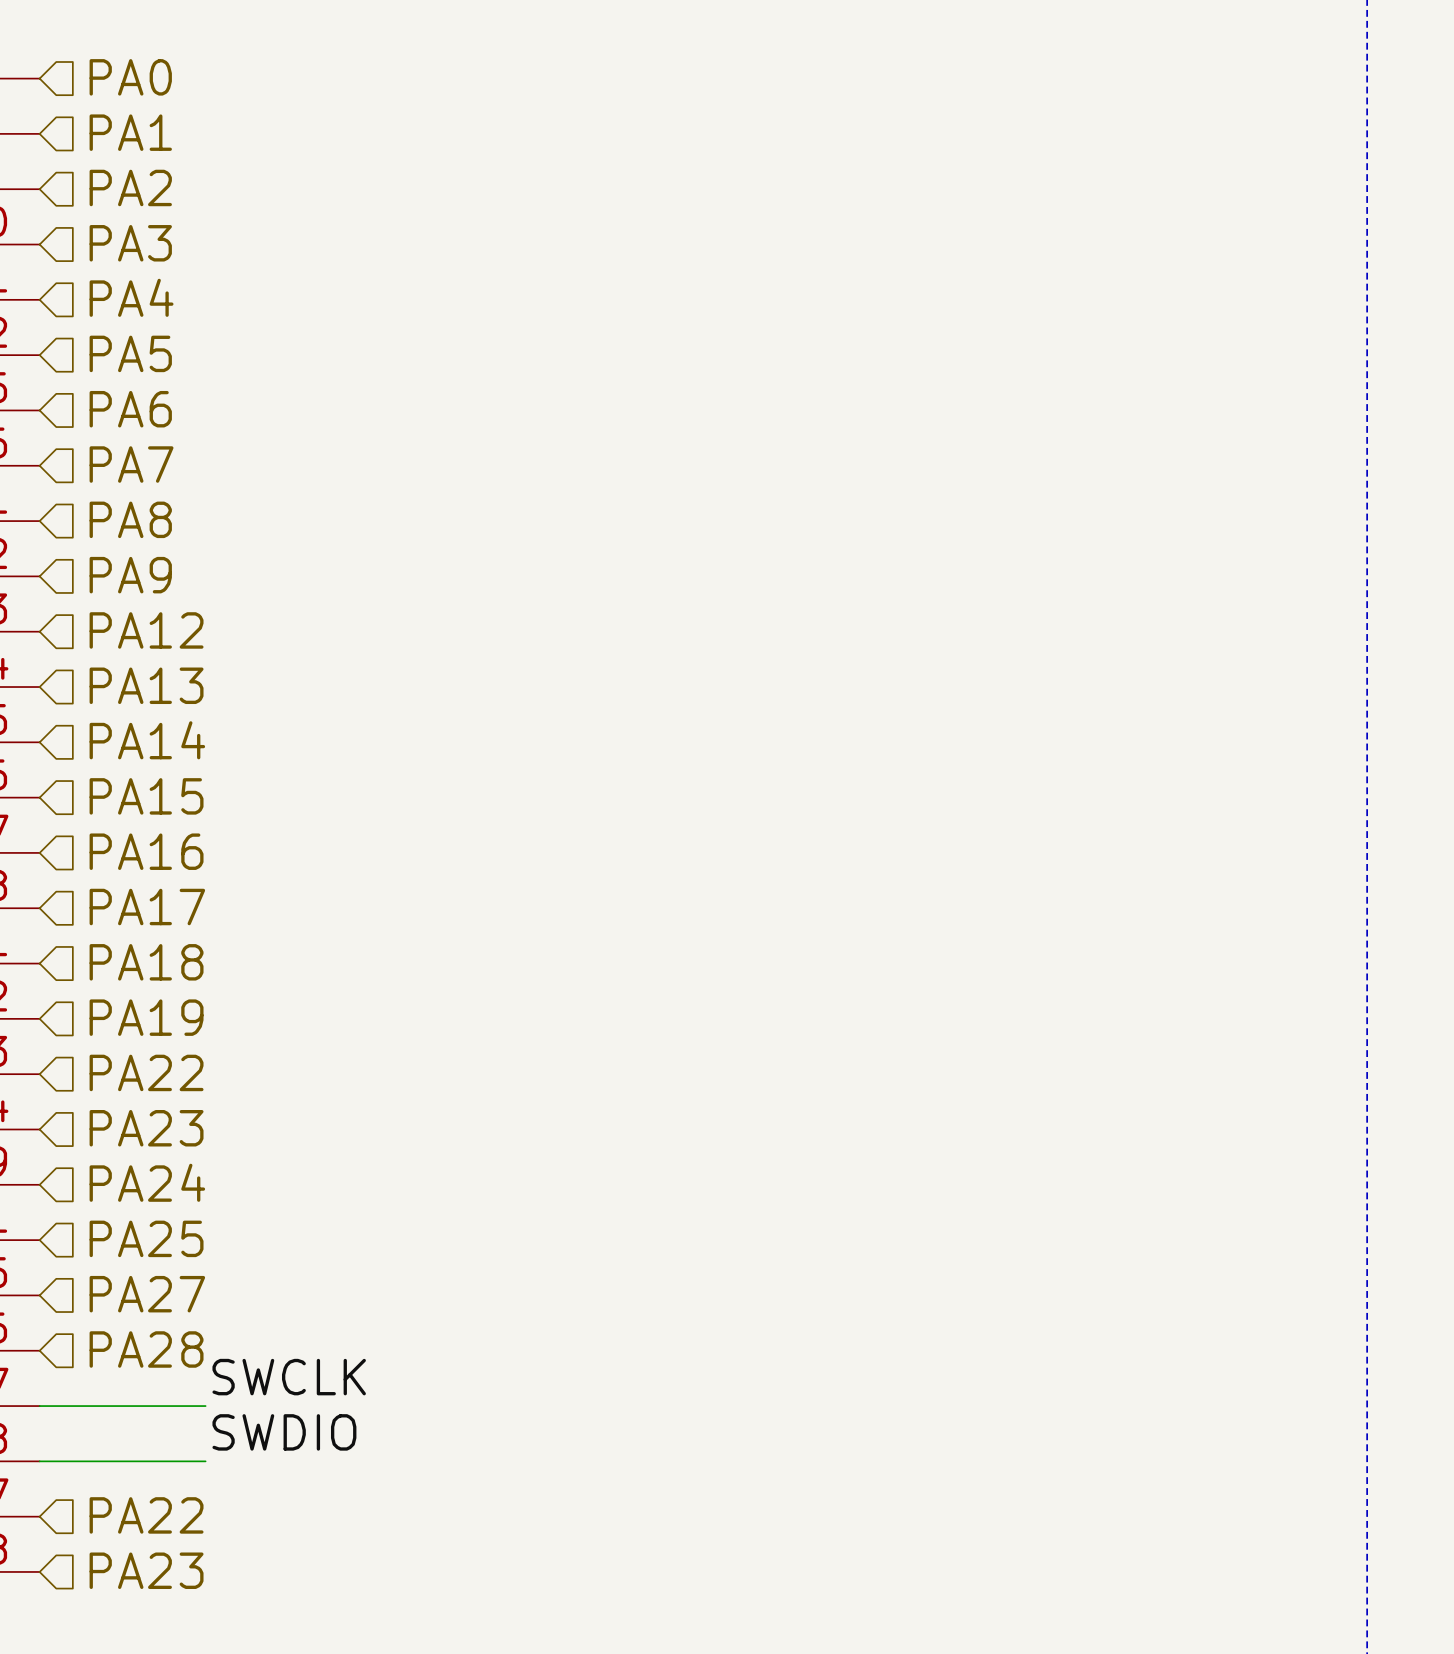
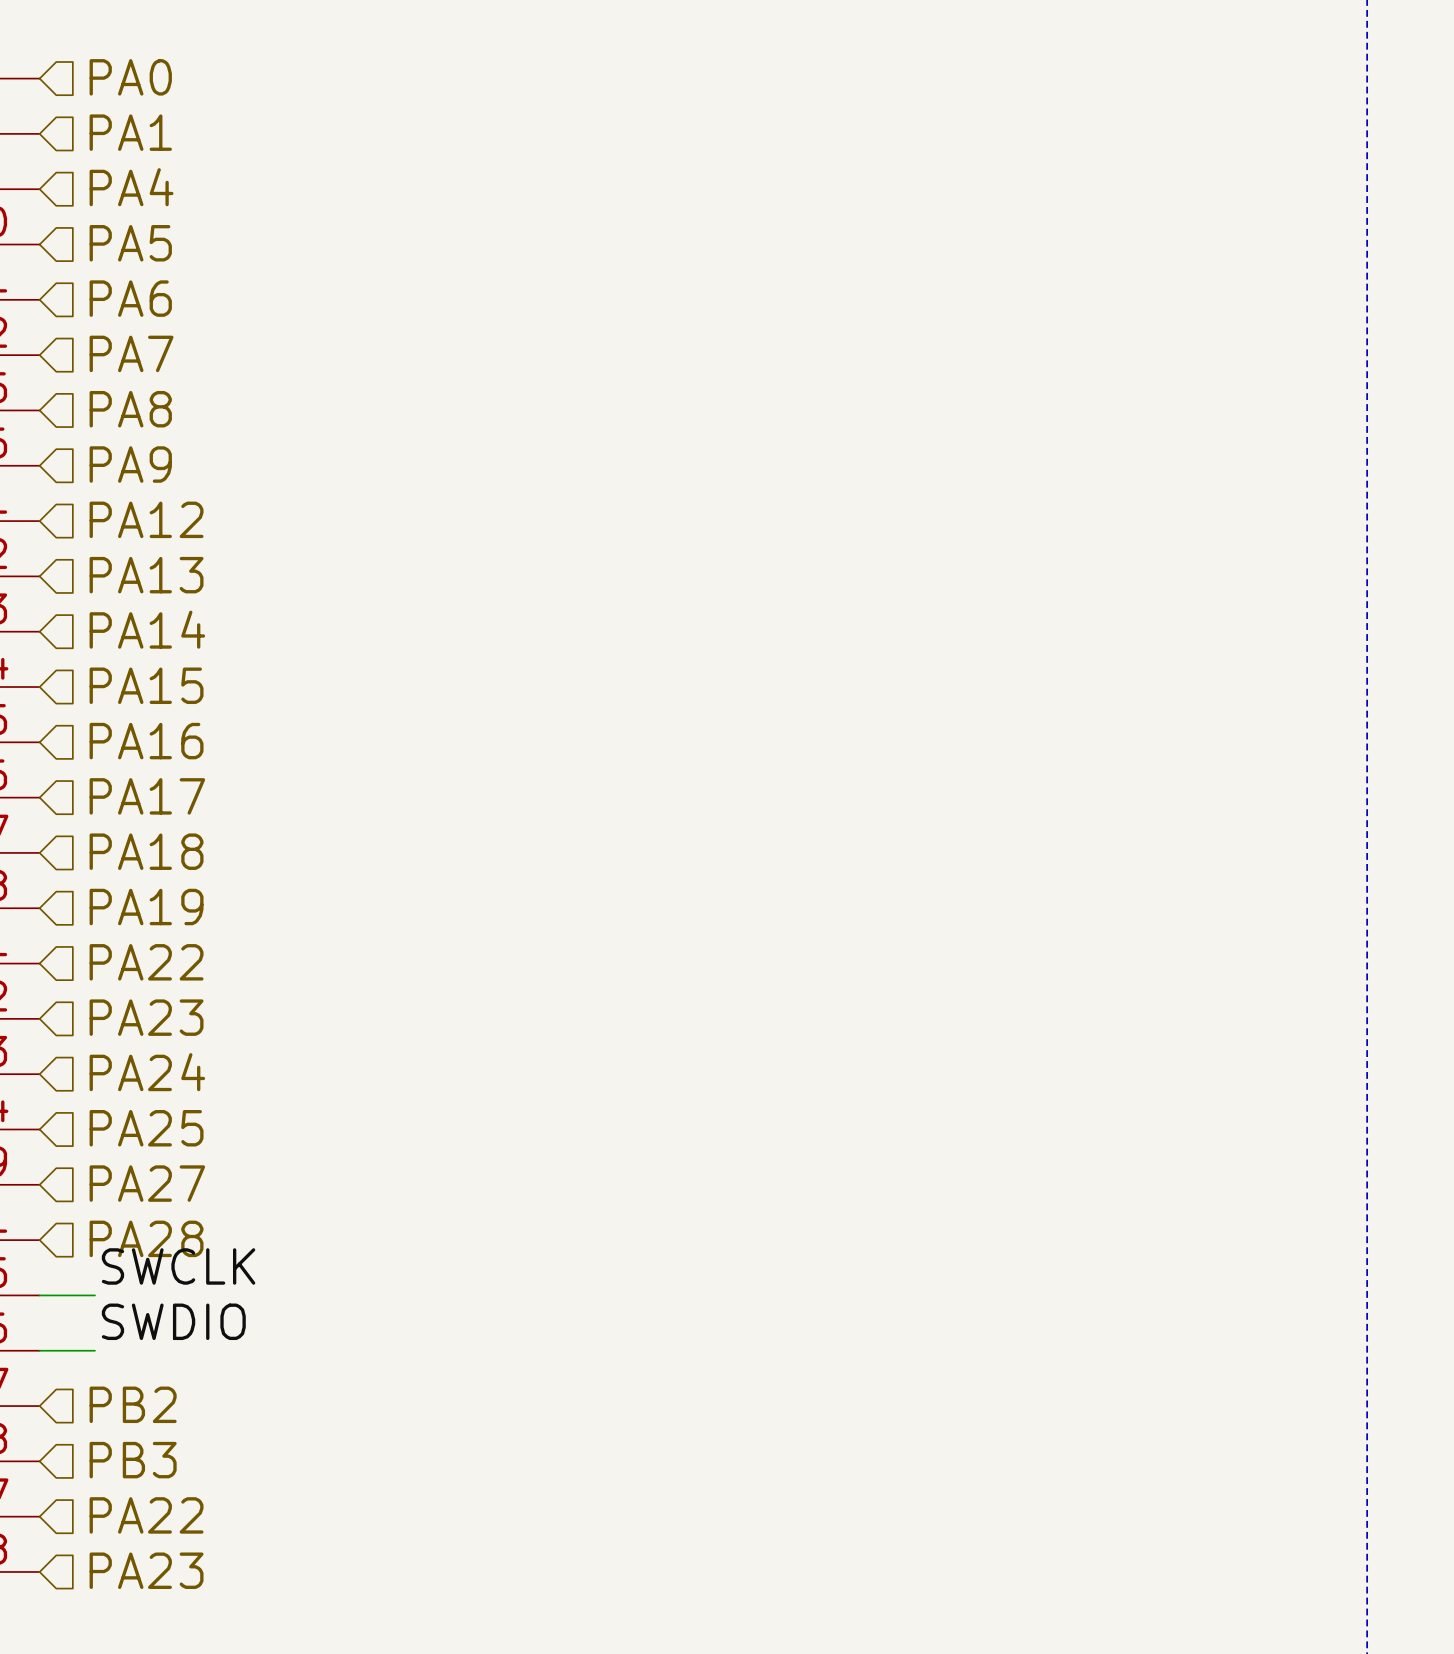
hierarchical label: PA2 (130, 187) -> PA4 (131, 187)
hierarchical label: PA3 (130, 243) -> PA5 (130, 243)
hierarchical label: PA4 (131, 297) -> PA6 (130, 298)
hierarchical label: PA5 (130, 353) -> PA7 (131, 353)
hierarchical label: PA6 (130, 409) -> PA8 (130, 409)
hierarchical label: PA7 (131, 464) -> PA9 (130, 464)
hierarchical label: PA8 (130, 519) -> PA12 (146, 519)
hierarchical label: PA9 (130, 575) -> PA13 (146, 575)
hierarchical label: PA12 (146, 630) -> PA14 (147, 629)
hierarchical label: PA13 (146, 685) -> PA15 (146, 685)
hierarchical label: PA14 (147, 740) -> PA16 (146, 741)
hierarchical label: PA15 (146, 796) -> PA17 (147, 796)
hierarchical label: PA16 (146, 851) -> PA18 (146, 851)
hierarchical label: PA17 (147, 907) -> PA19 (146, 907)
hierarchical label: PA18 (146, 962) -> PA22 (146, 962)
hierarchical label: PA19 (146, 1017) -> PA23 (146, 1017)
hierarchical label: PA22 (146, 1072) -> PA24 (147, 1072)
hierarchical label: PA23 (146, 1128) -> PA25 (146, 1128)
hierarchical label: PA24 (147, 1182) -> PA27 (147, 1183)
hierarchical label: PA25 (146, 1238) -> PA28 (146, 1238)
hierarchical label: PA27 (147, 1294) -> none
wire: none -> (39, 1295) (94, 1295)
hierarchical label: PA28 (146, 1349) -> none
wire: none -> (39, 1350) (94, 1350)
label position: SWCLK (289, 1377) -> SWCLK (178, 1266)
hierarchical label: none -> PB2 (133, 1404)
wire: (39, 1406) (205, 1406) -> none
label position: SWDIO (284, 1432) -> SWDIO (173, 1321)
hierarchical label: none -> PB3 (133, 1460)
wire: (39, 1461) (205, 1461) -> none

